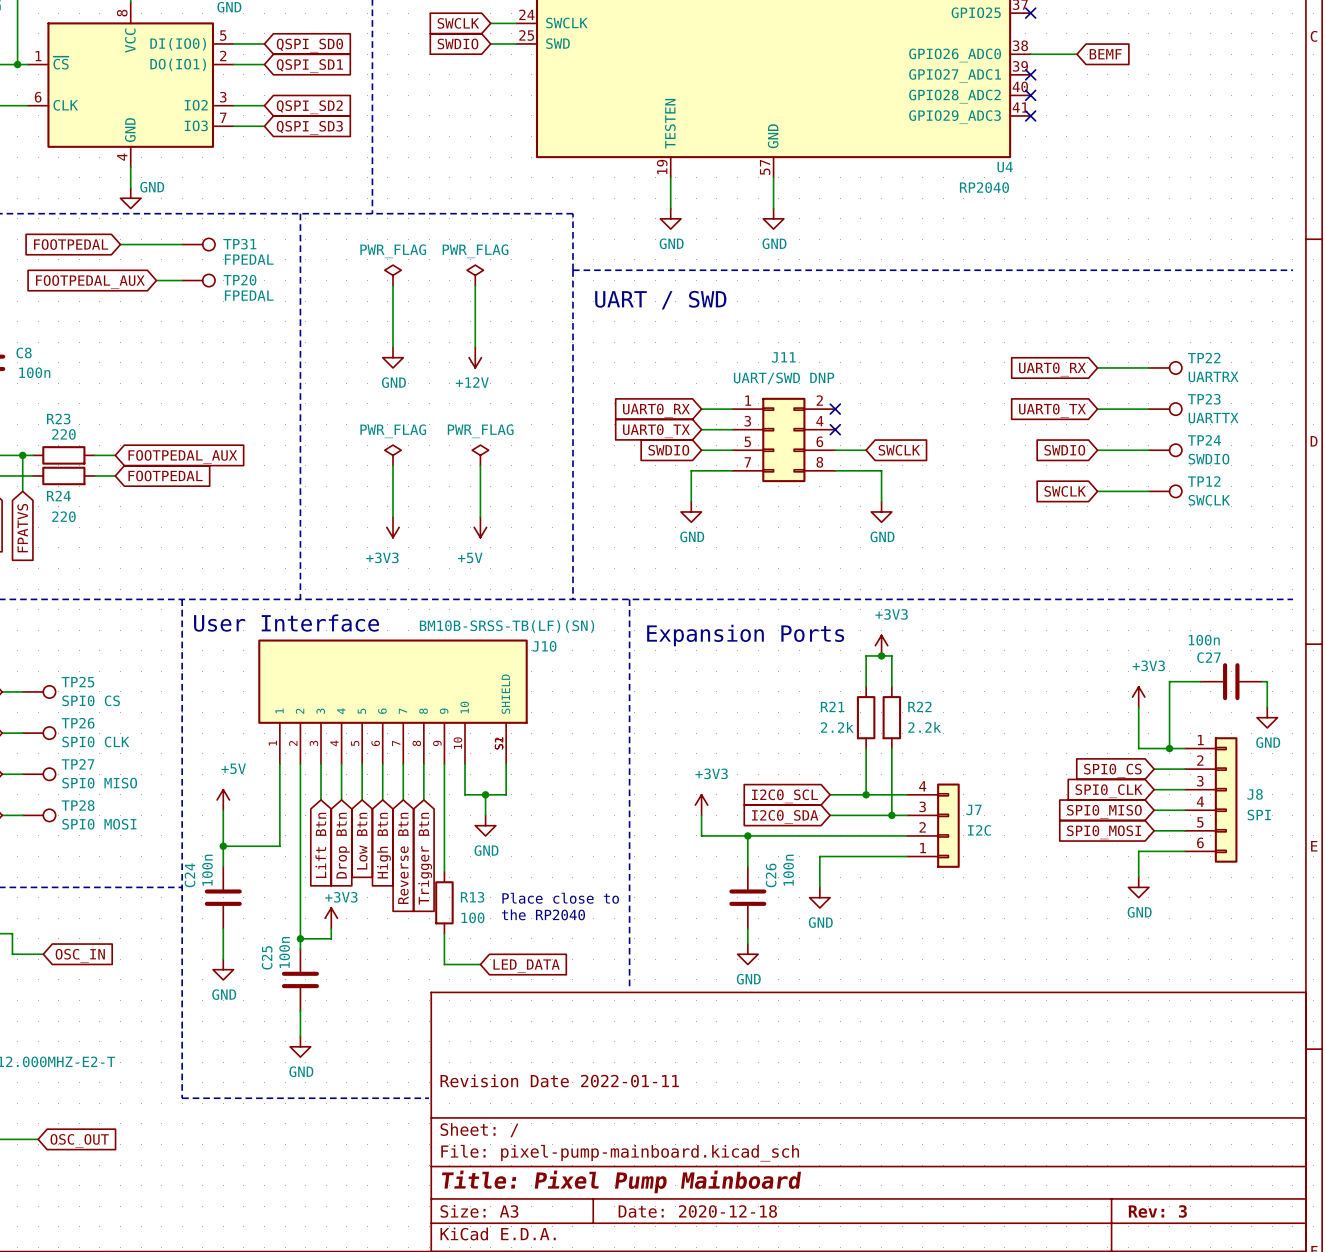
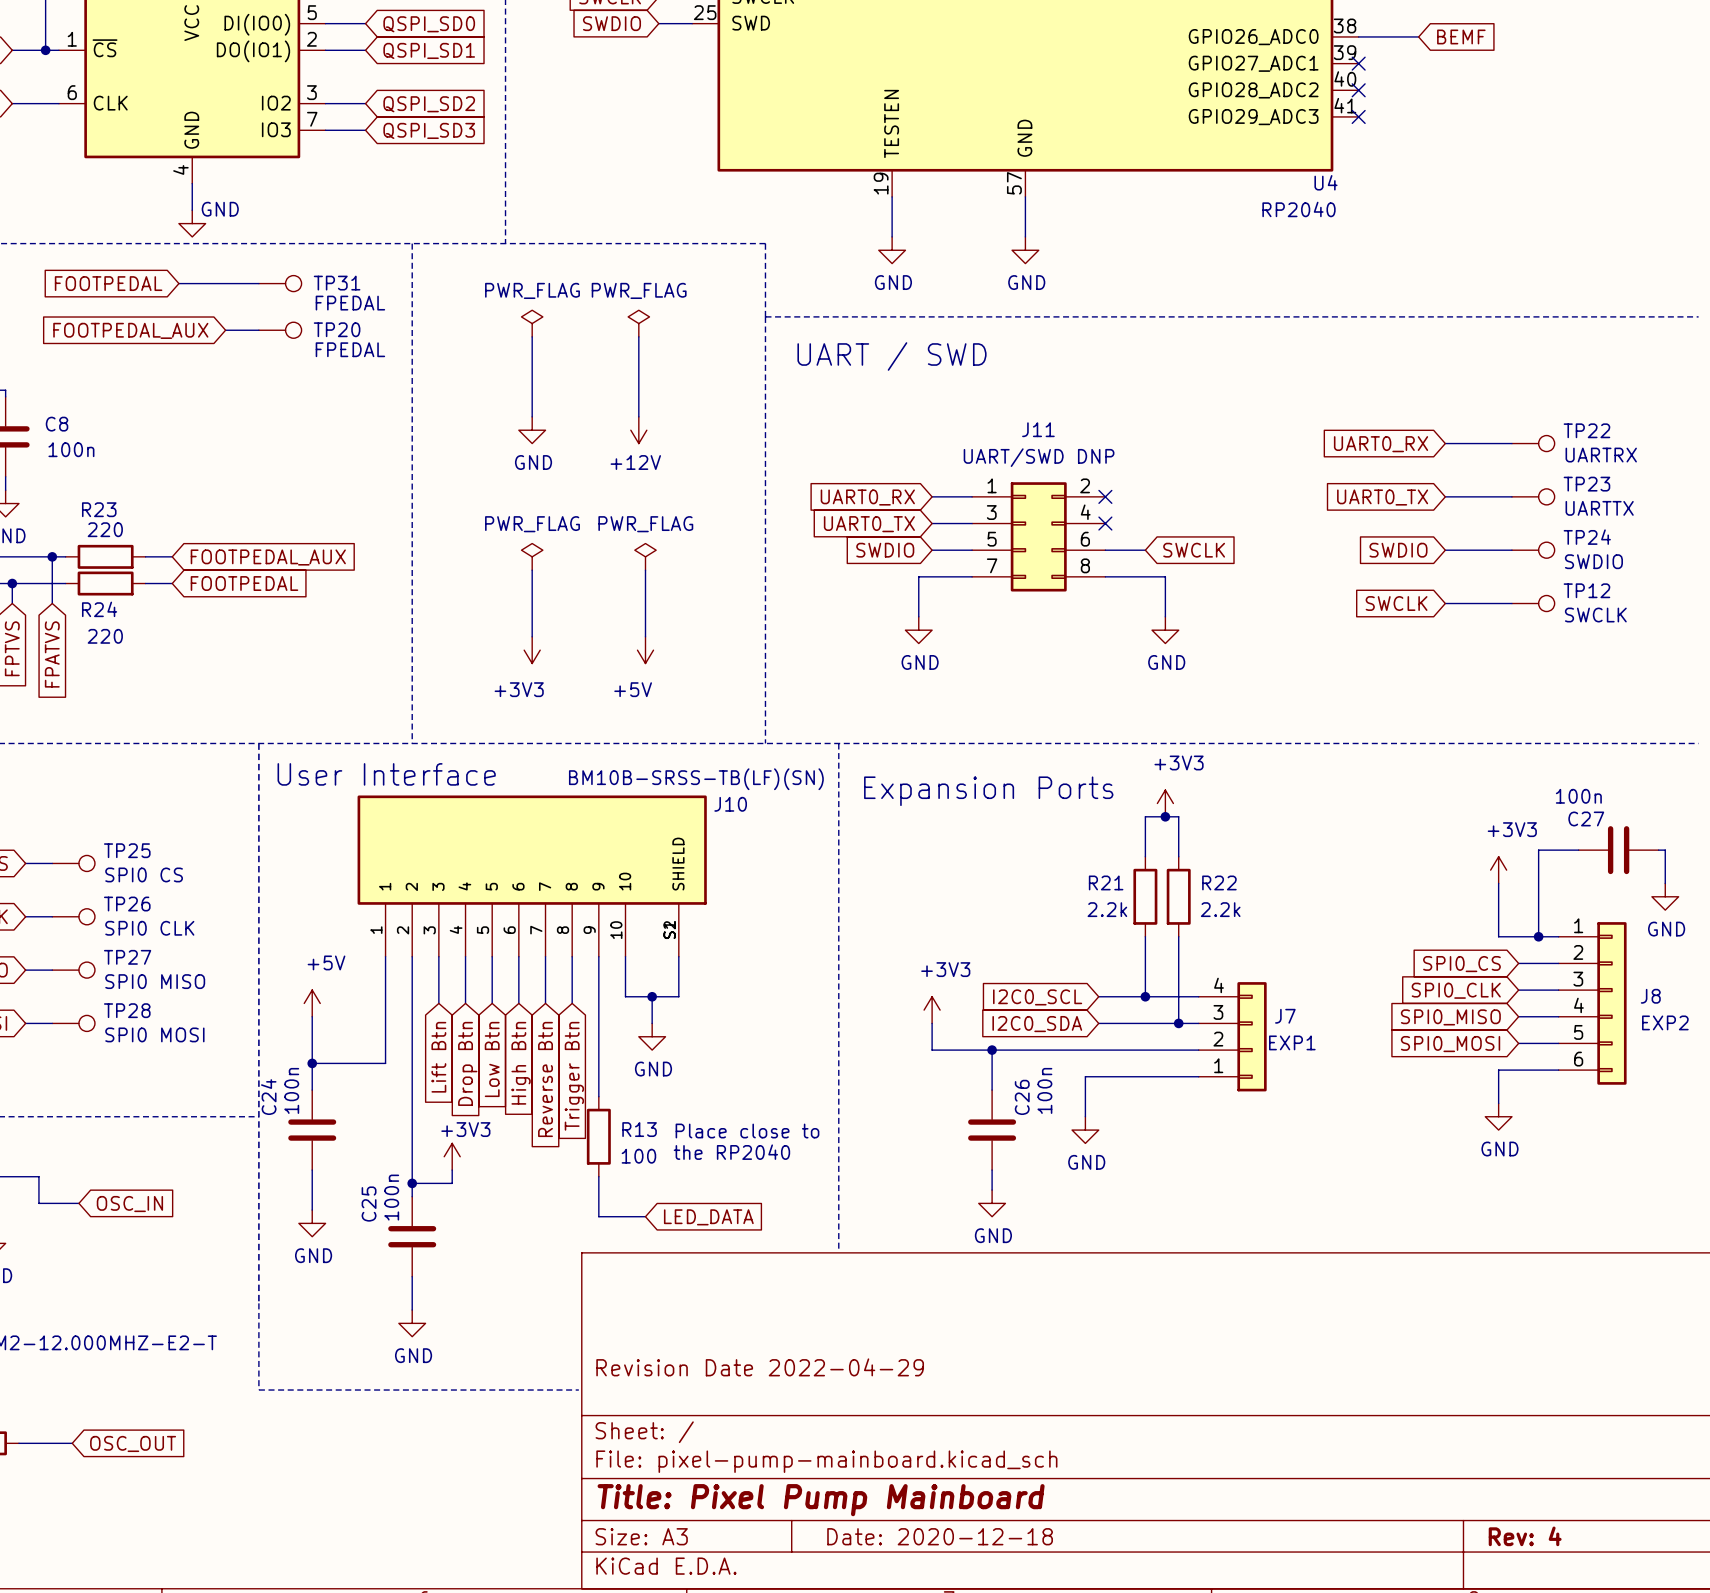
J8 value: SPI (1259, 815) -> EXP2 (1665, 1022)
J7 value: I2C (979, 830) -> EXP1 (1292, 1042)
title block: Revision Date 2022-01-11 (559, 1080) -> Revision Date 2022-04-29 (760, 1367)
title block: Rev: 3 (1157, 1211) -> Rev: 4 (1525, 1536)

